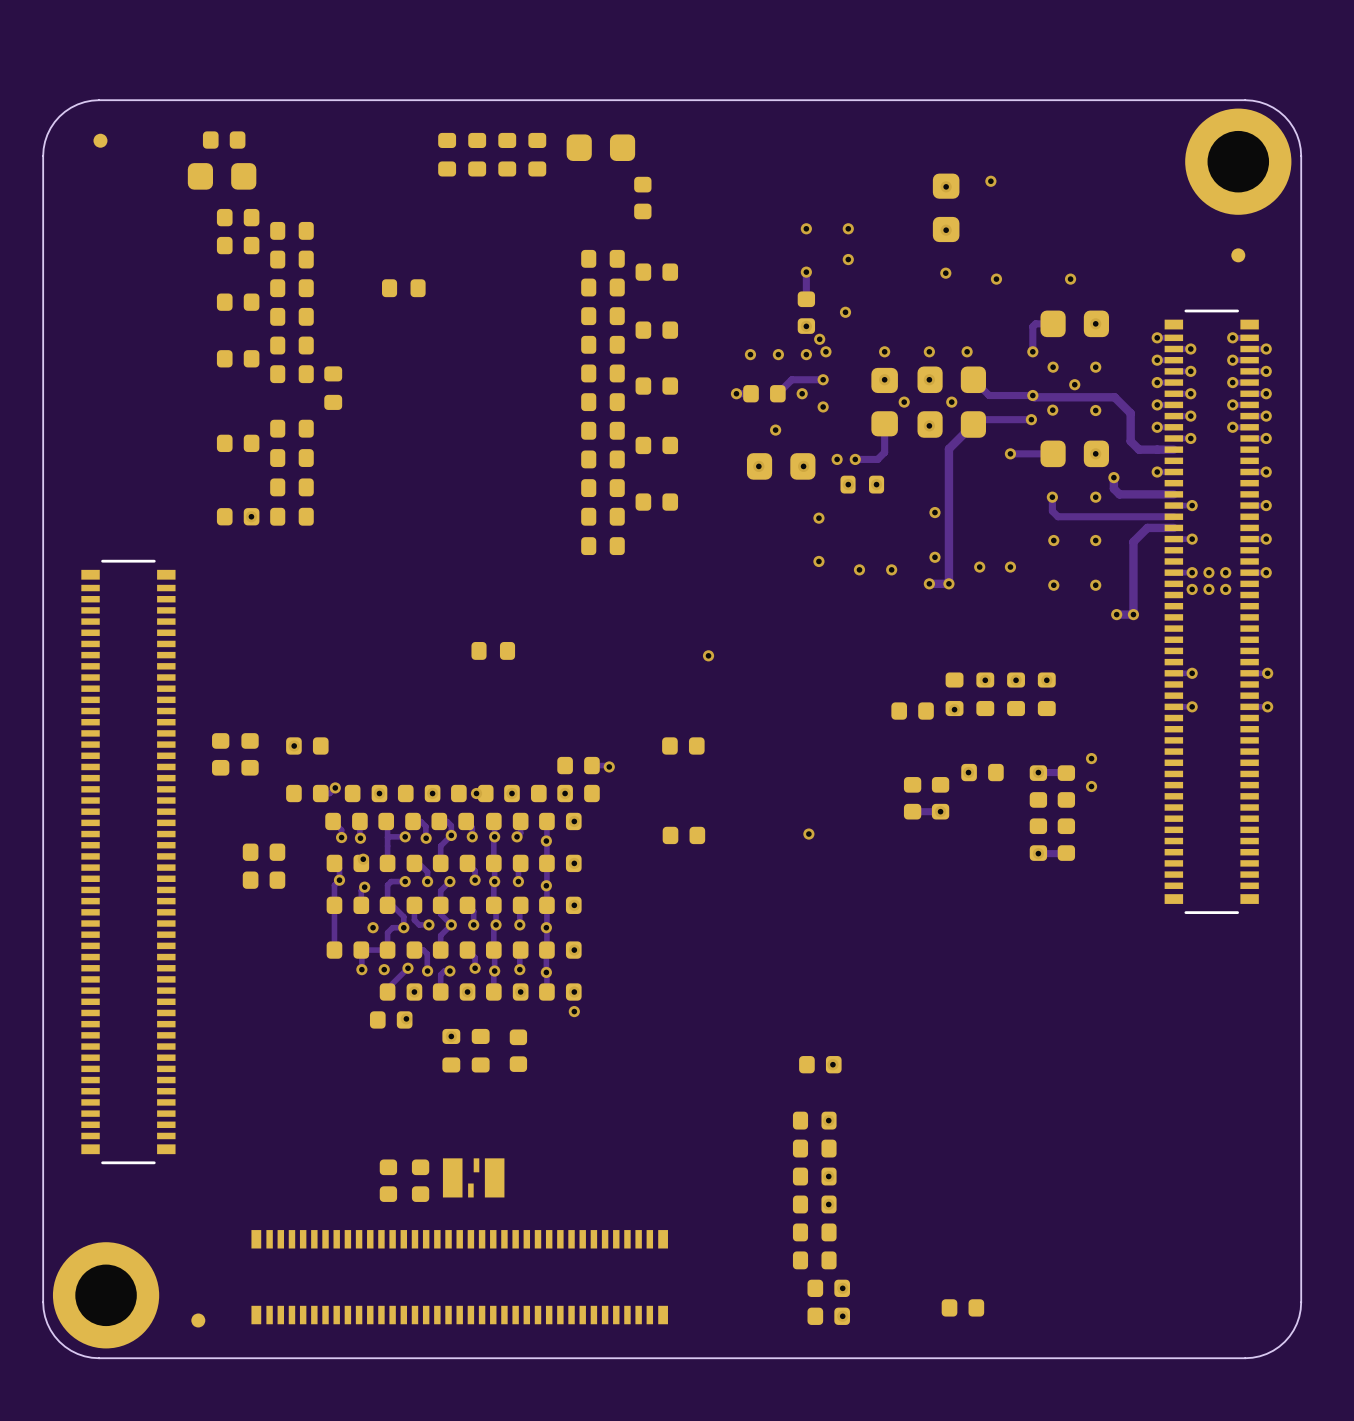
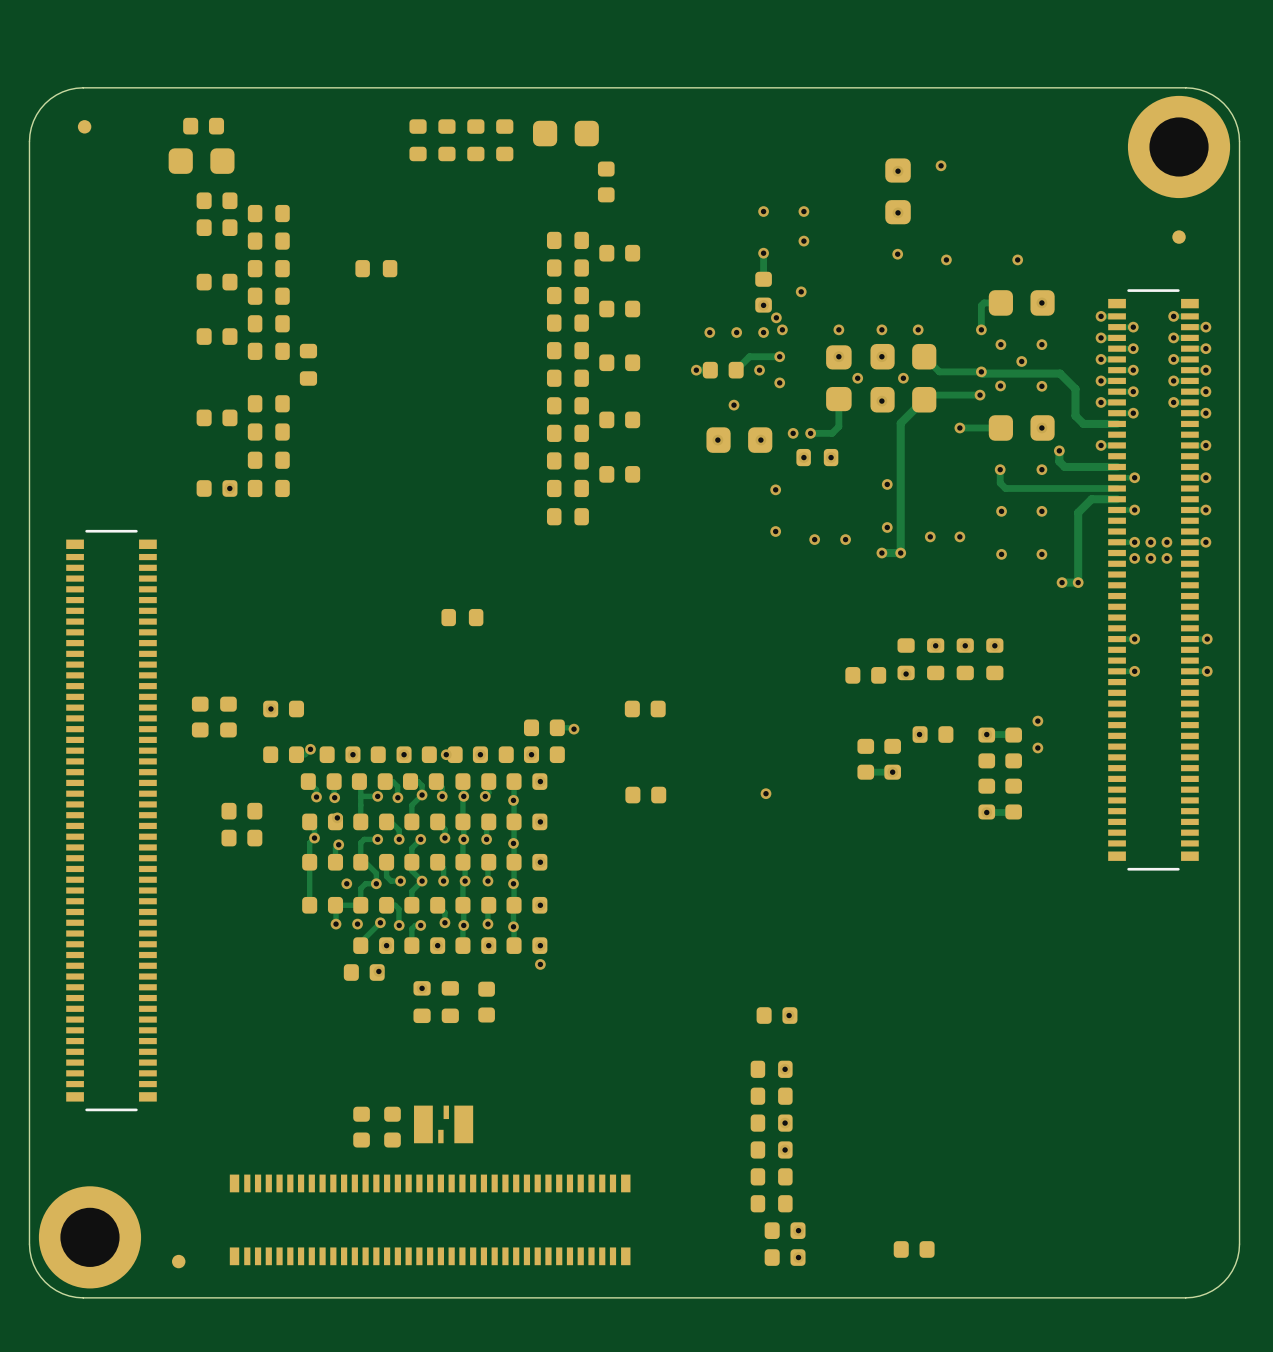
via: (708, 655) -> none

